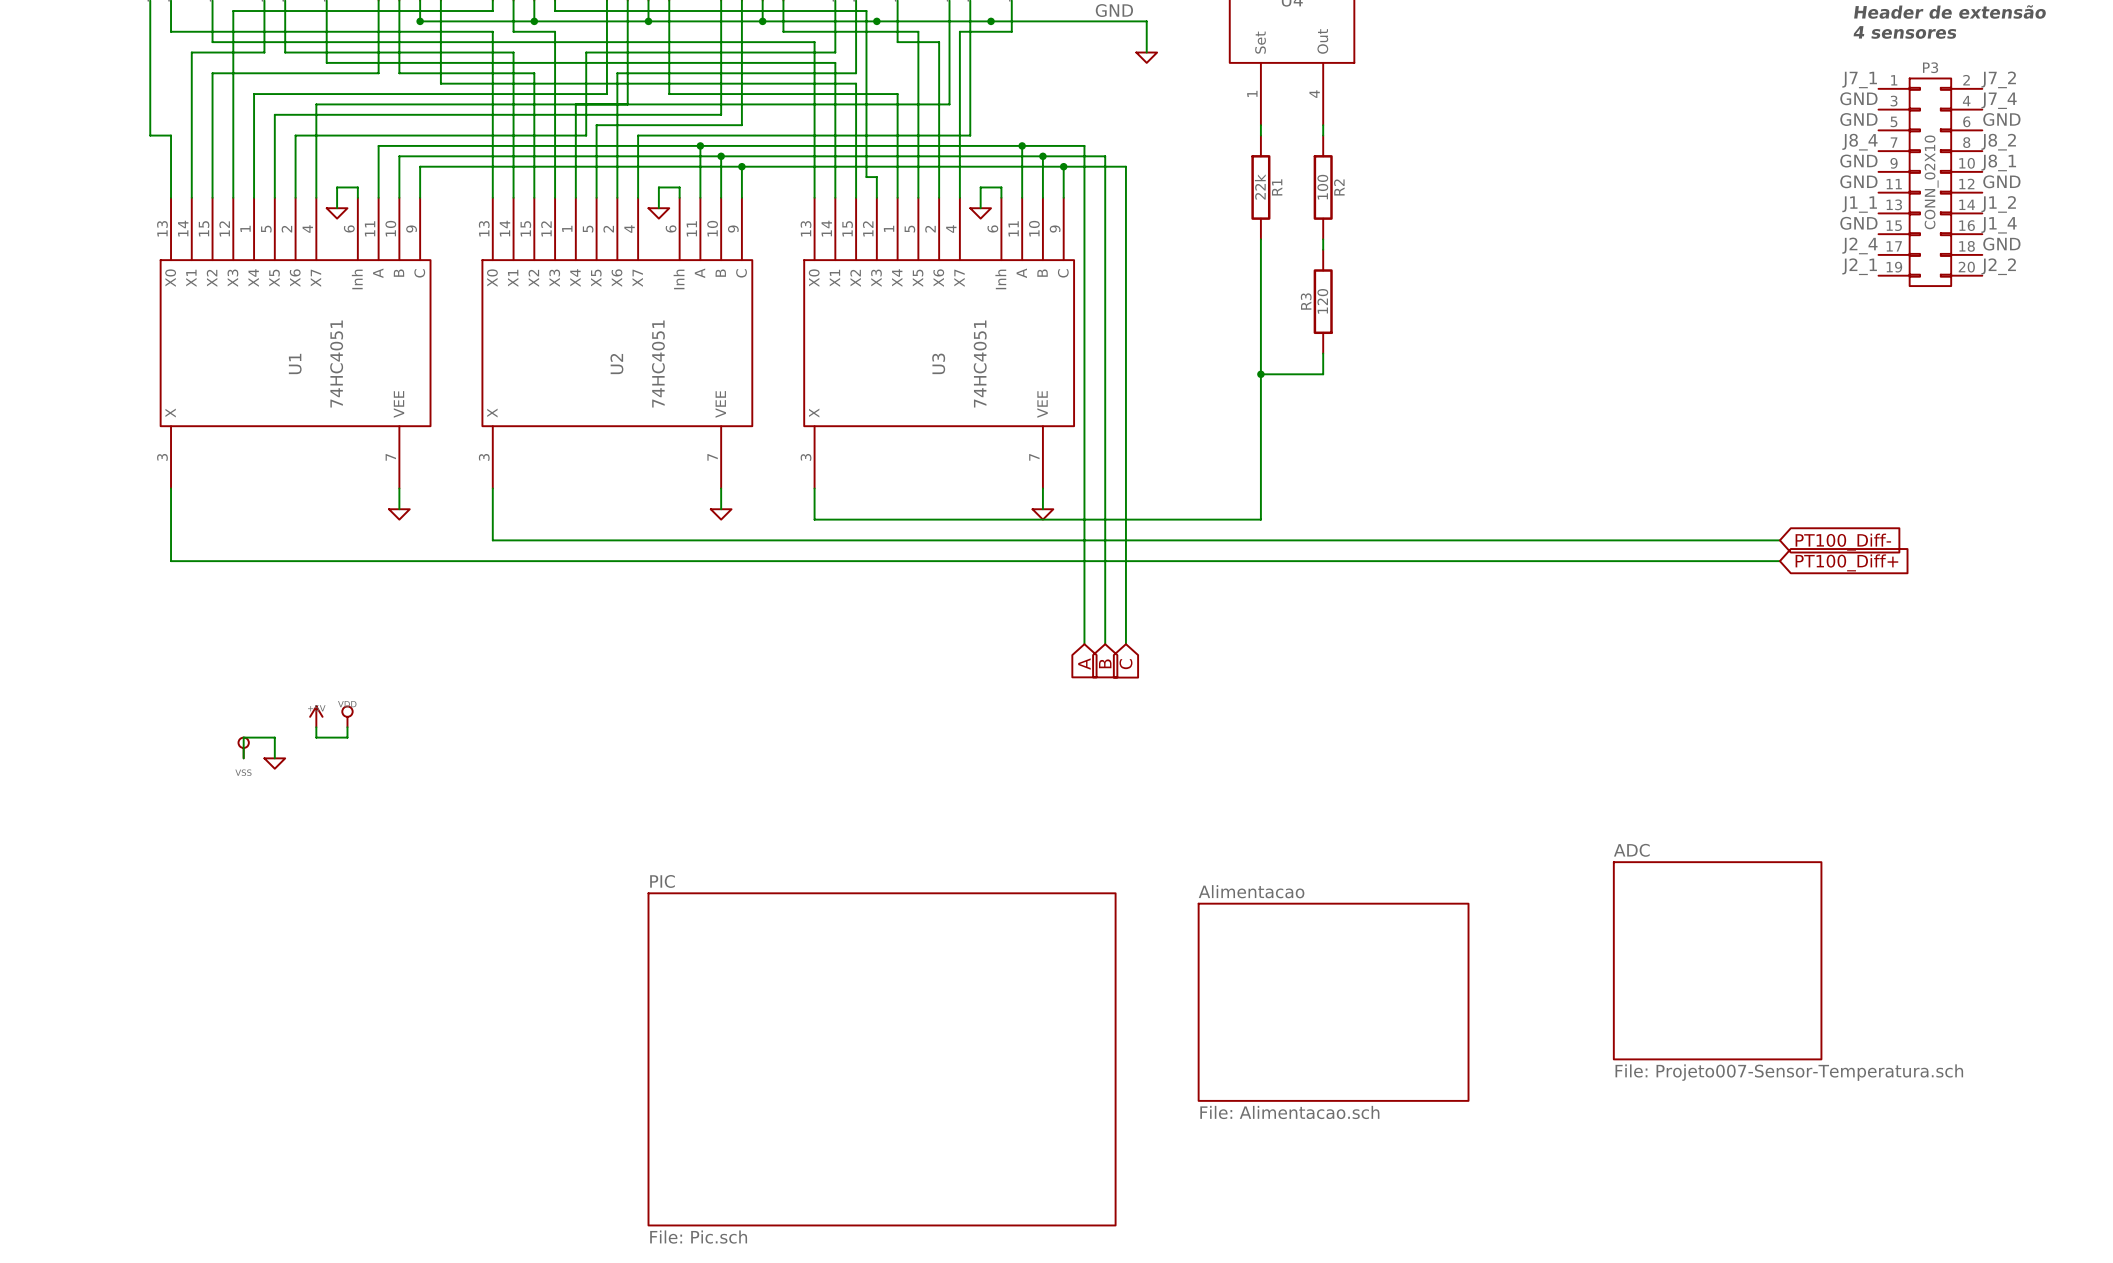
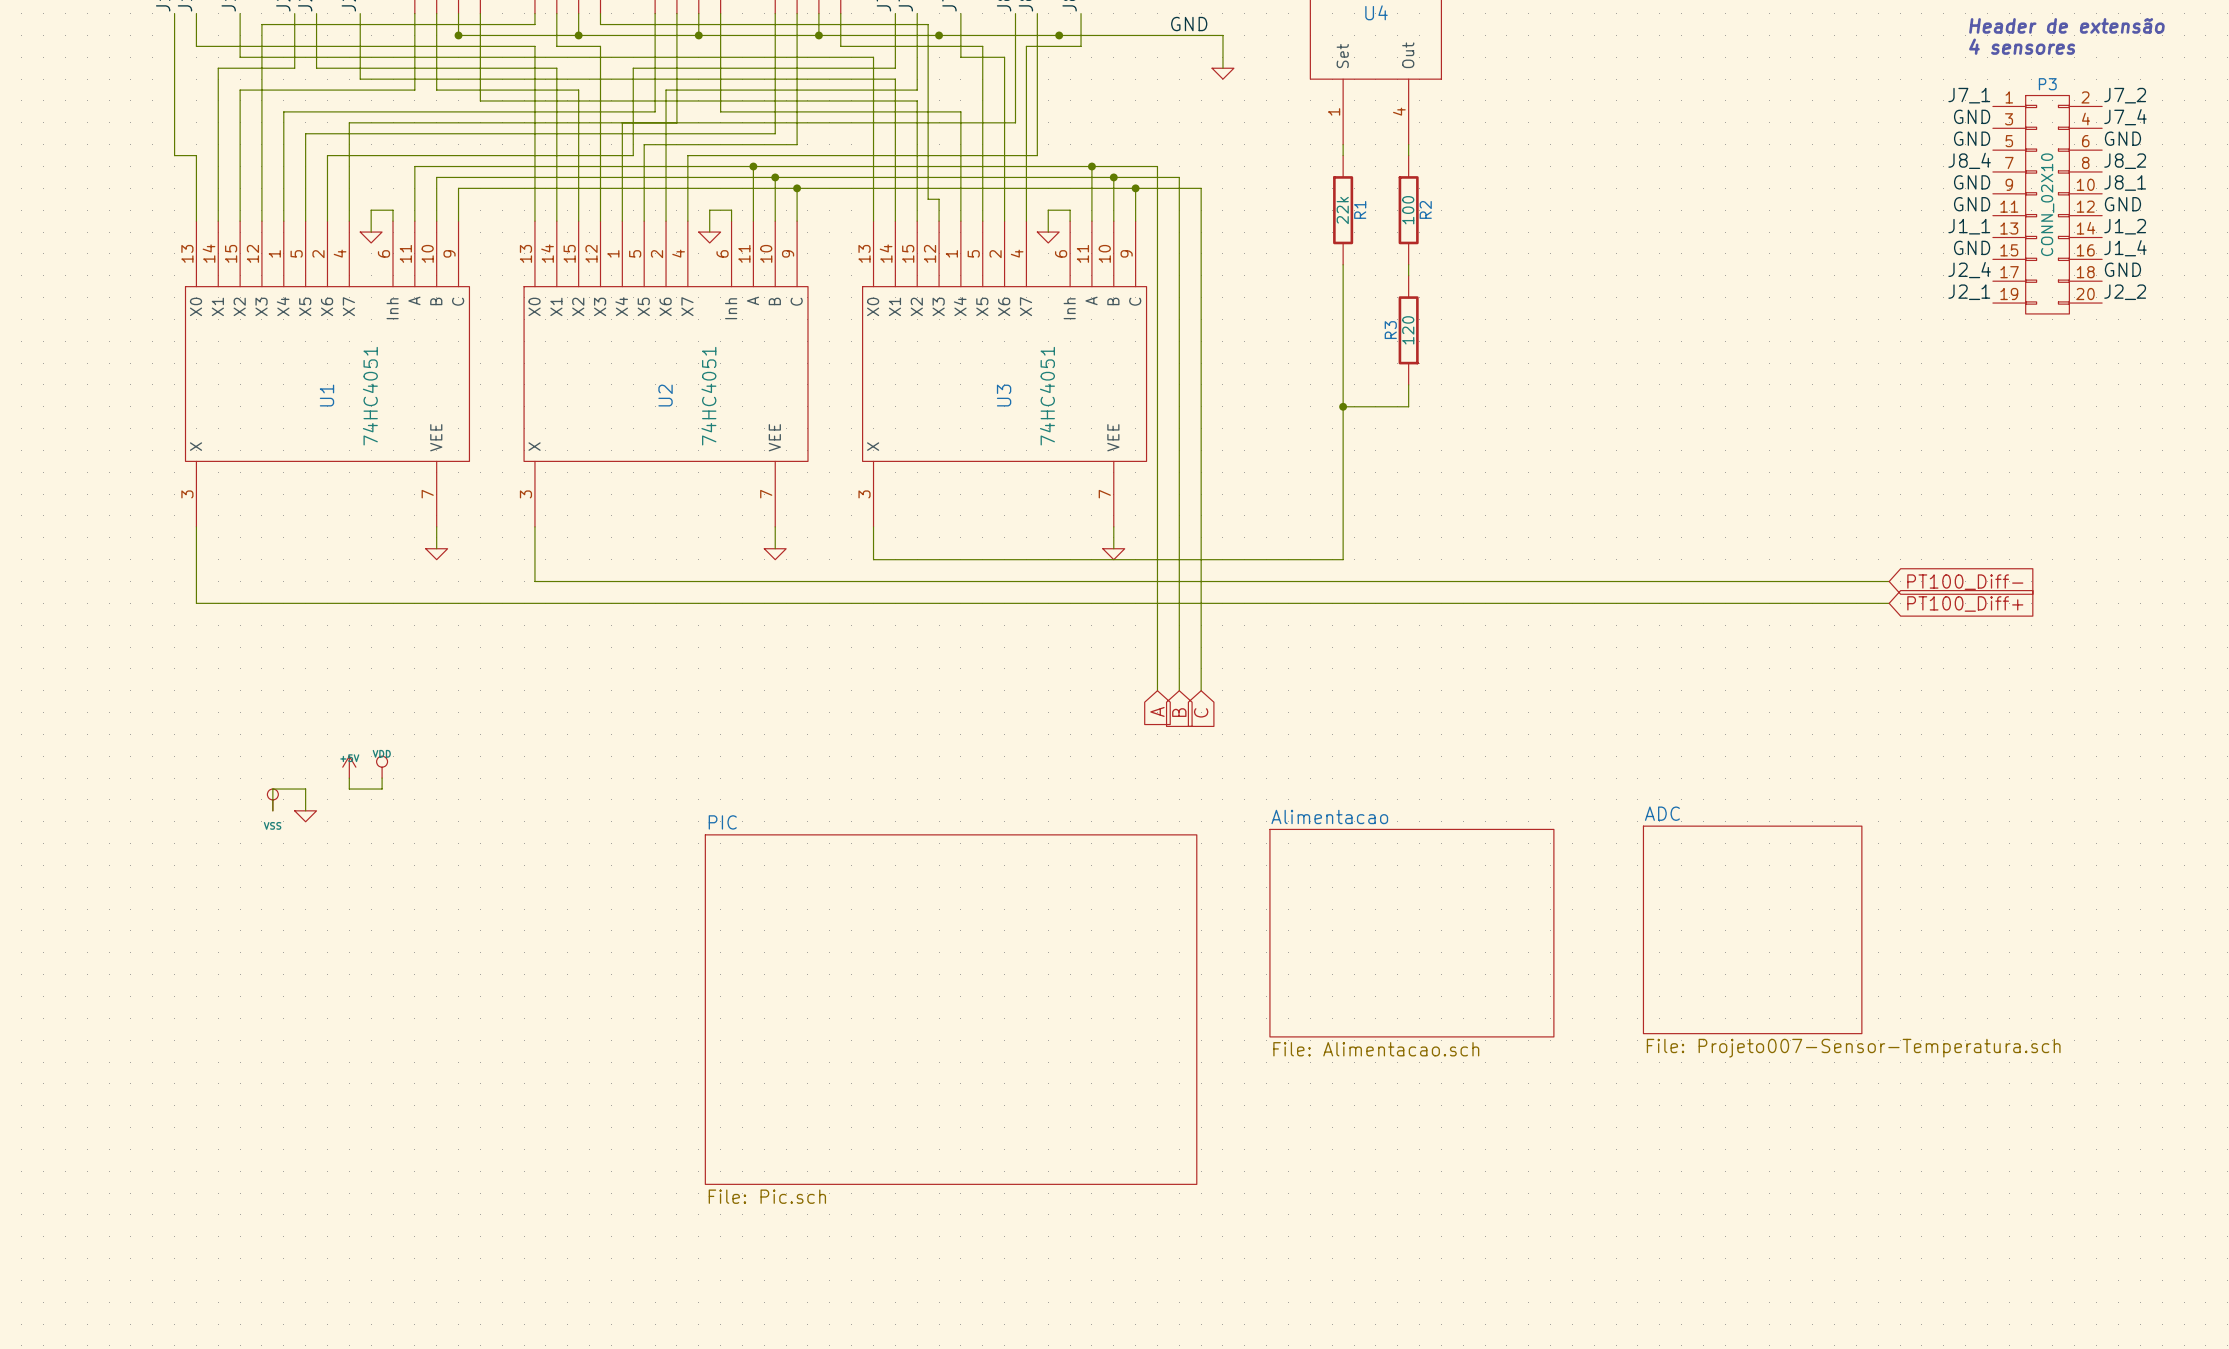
sheet ADC position: (1717, 960) -> (1752, 929)
sheet Alimentacao position: (1333, 1002) -> (1411, 933)
sheet PIC position: (882, 1059) -> (951, 1009)

